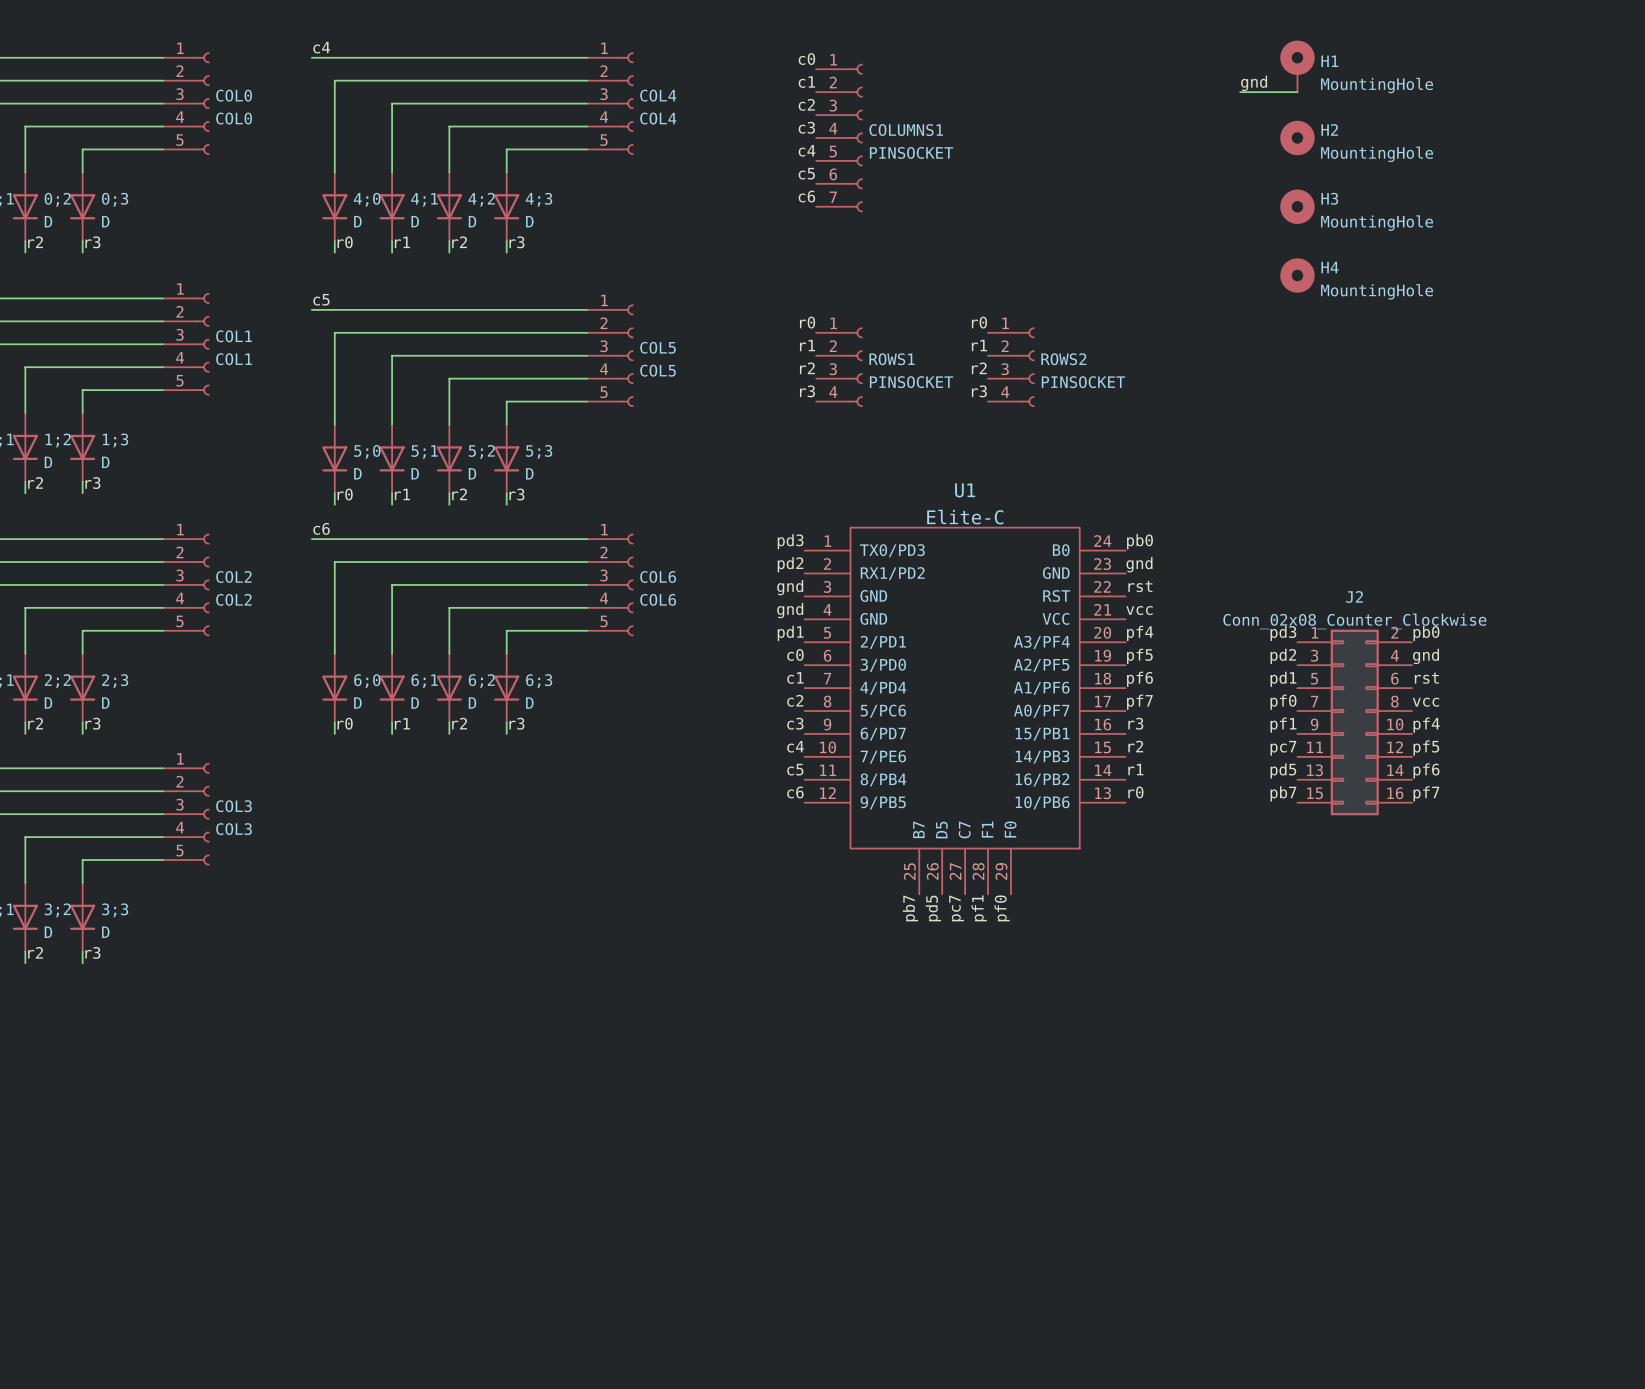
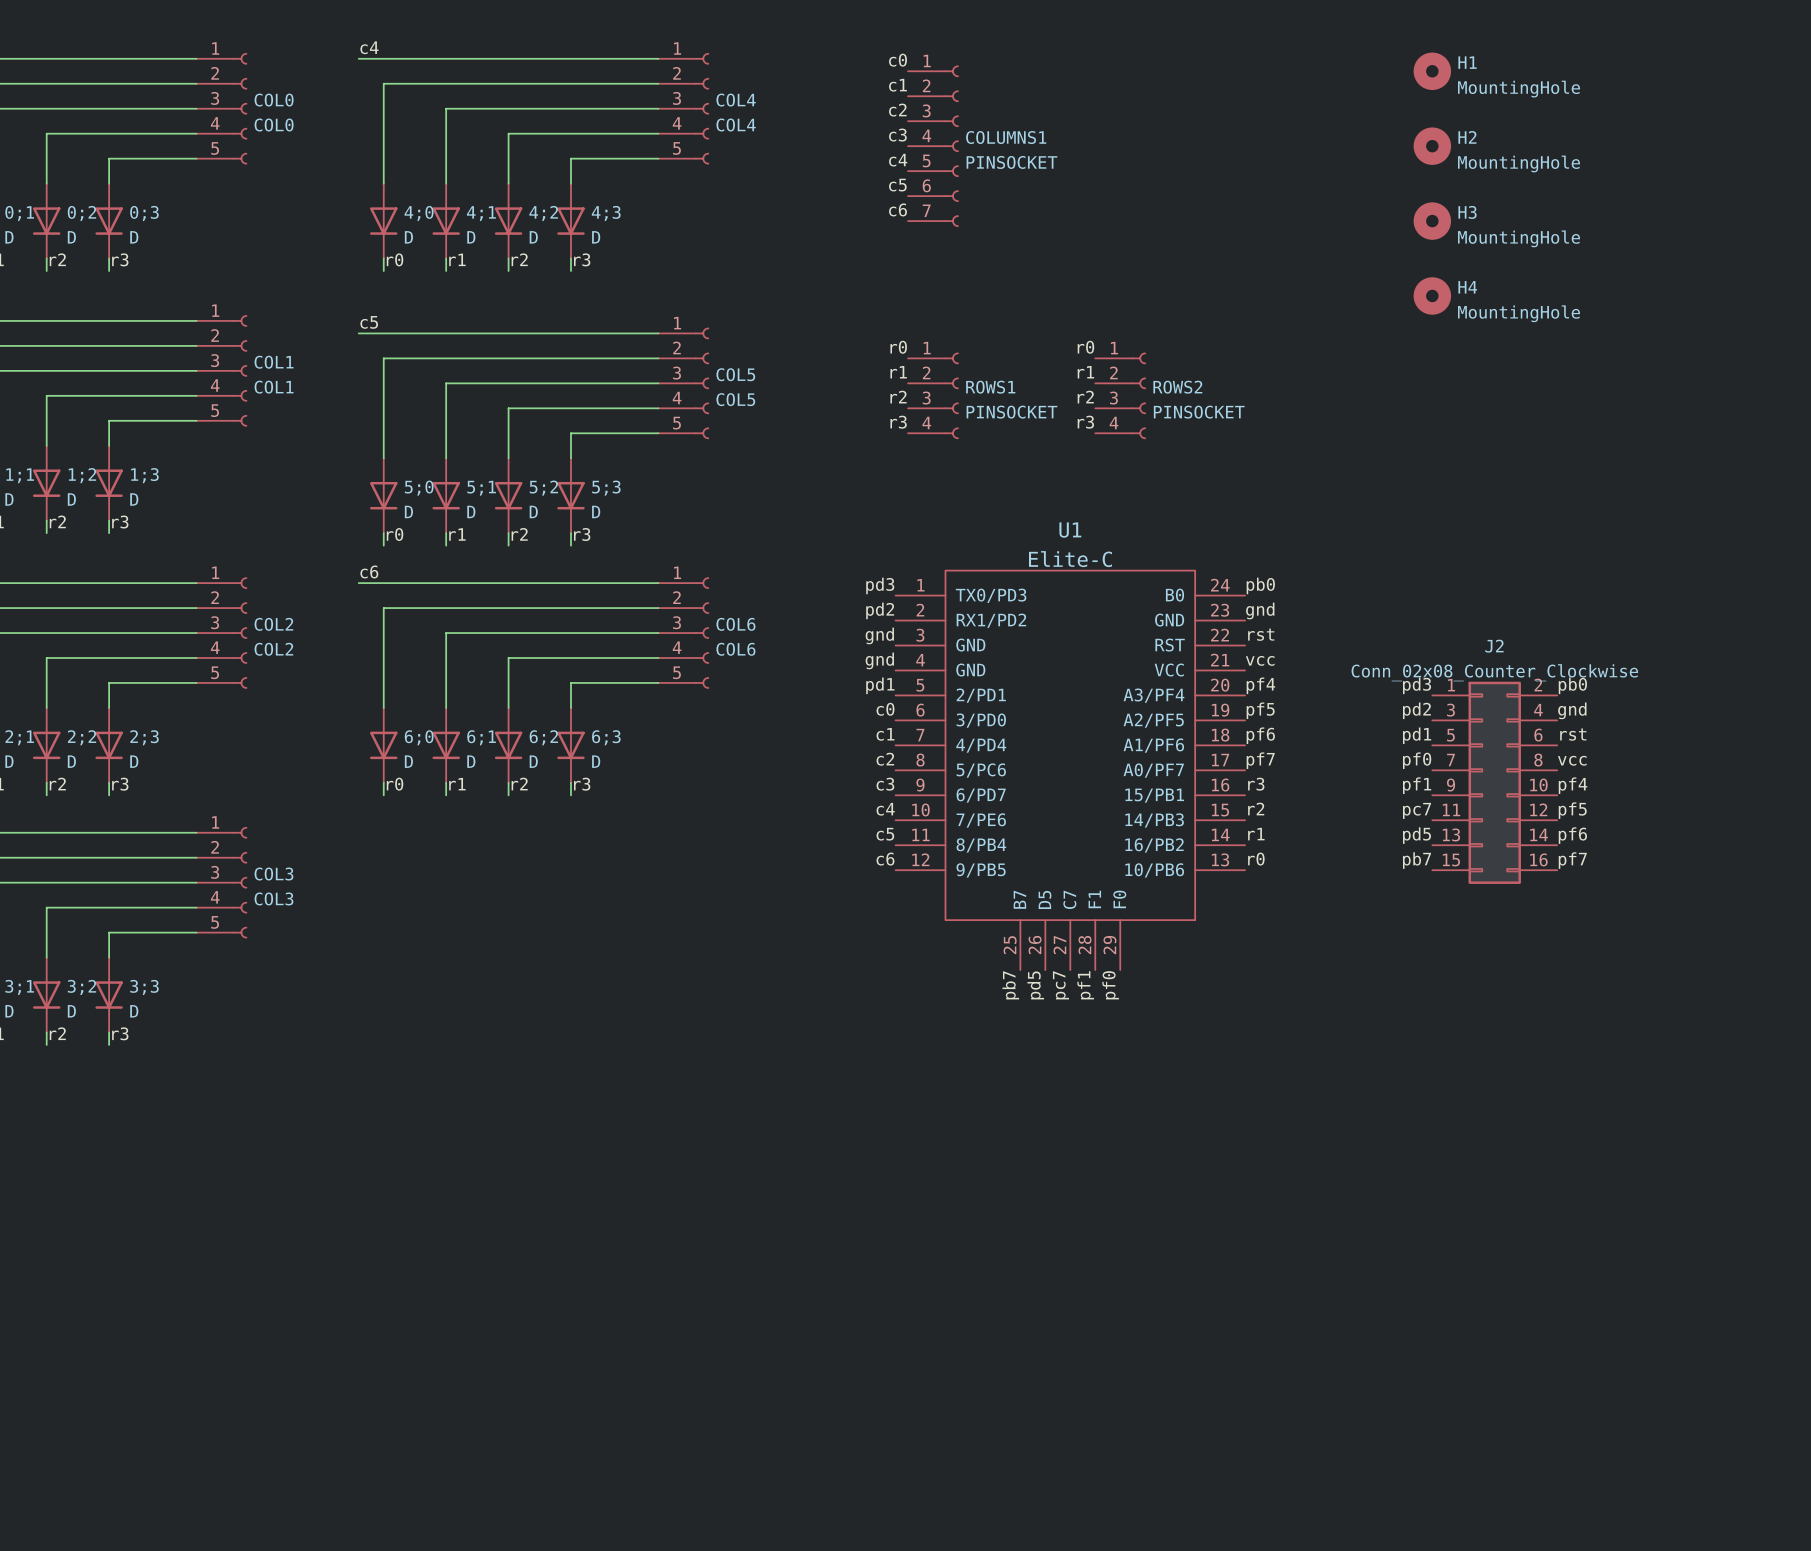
H1 symbol: [1280, 40, 1315, 93] -> [1413, 52, 1452, 91]
label: gnd (1254, 83) -> none
wire: (1240, 92) (1297, 92) -> none

